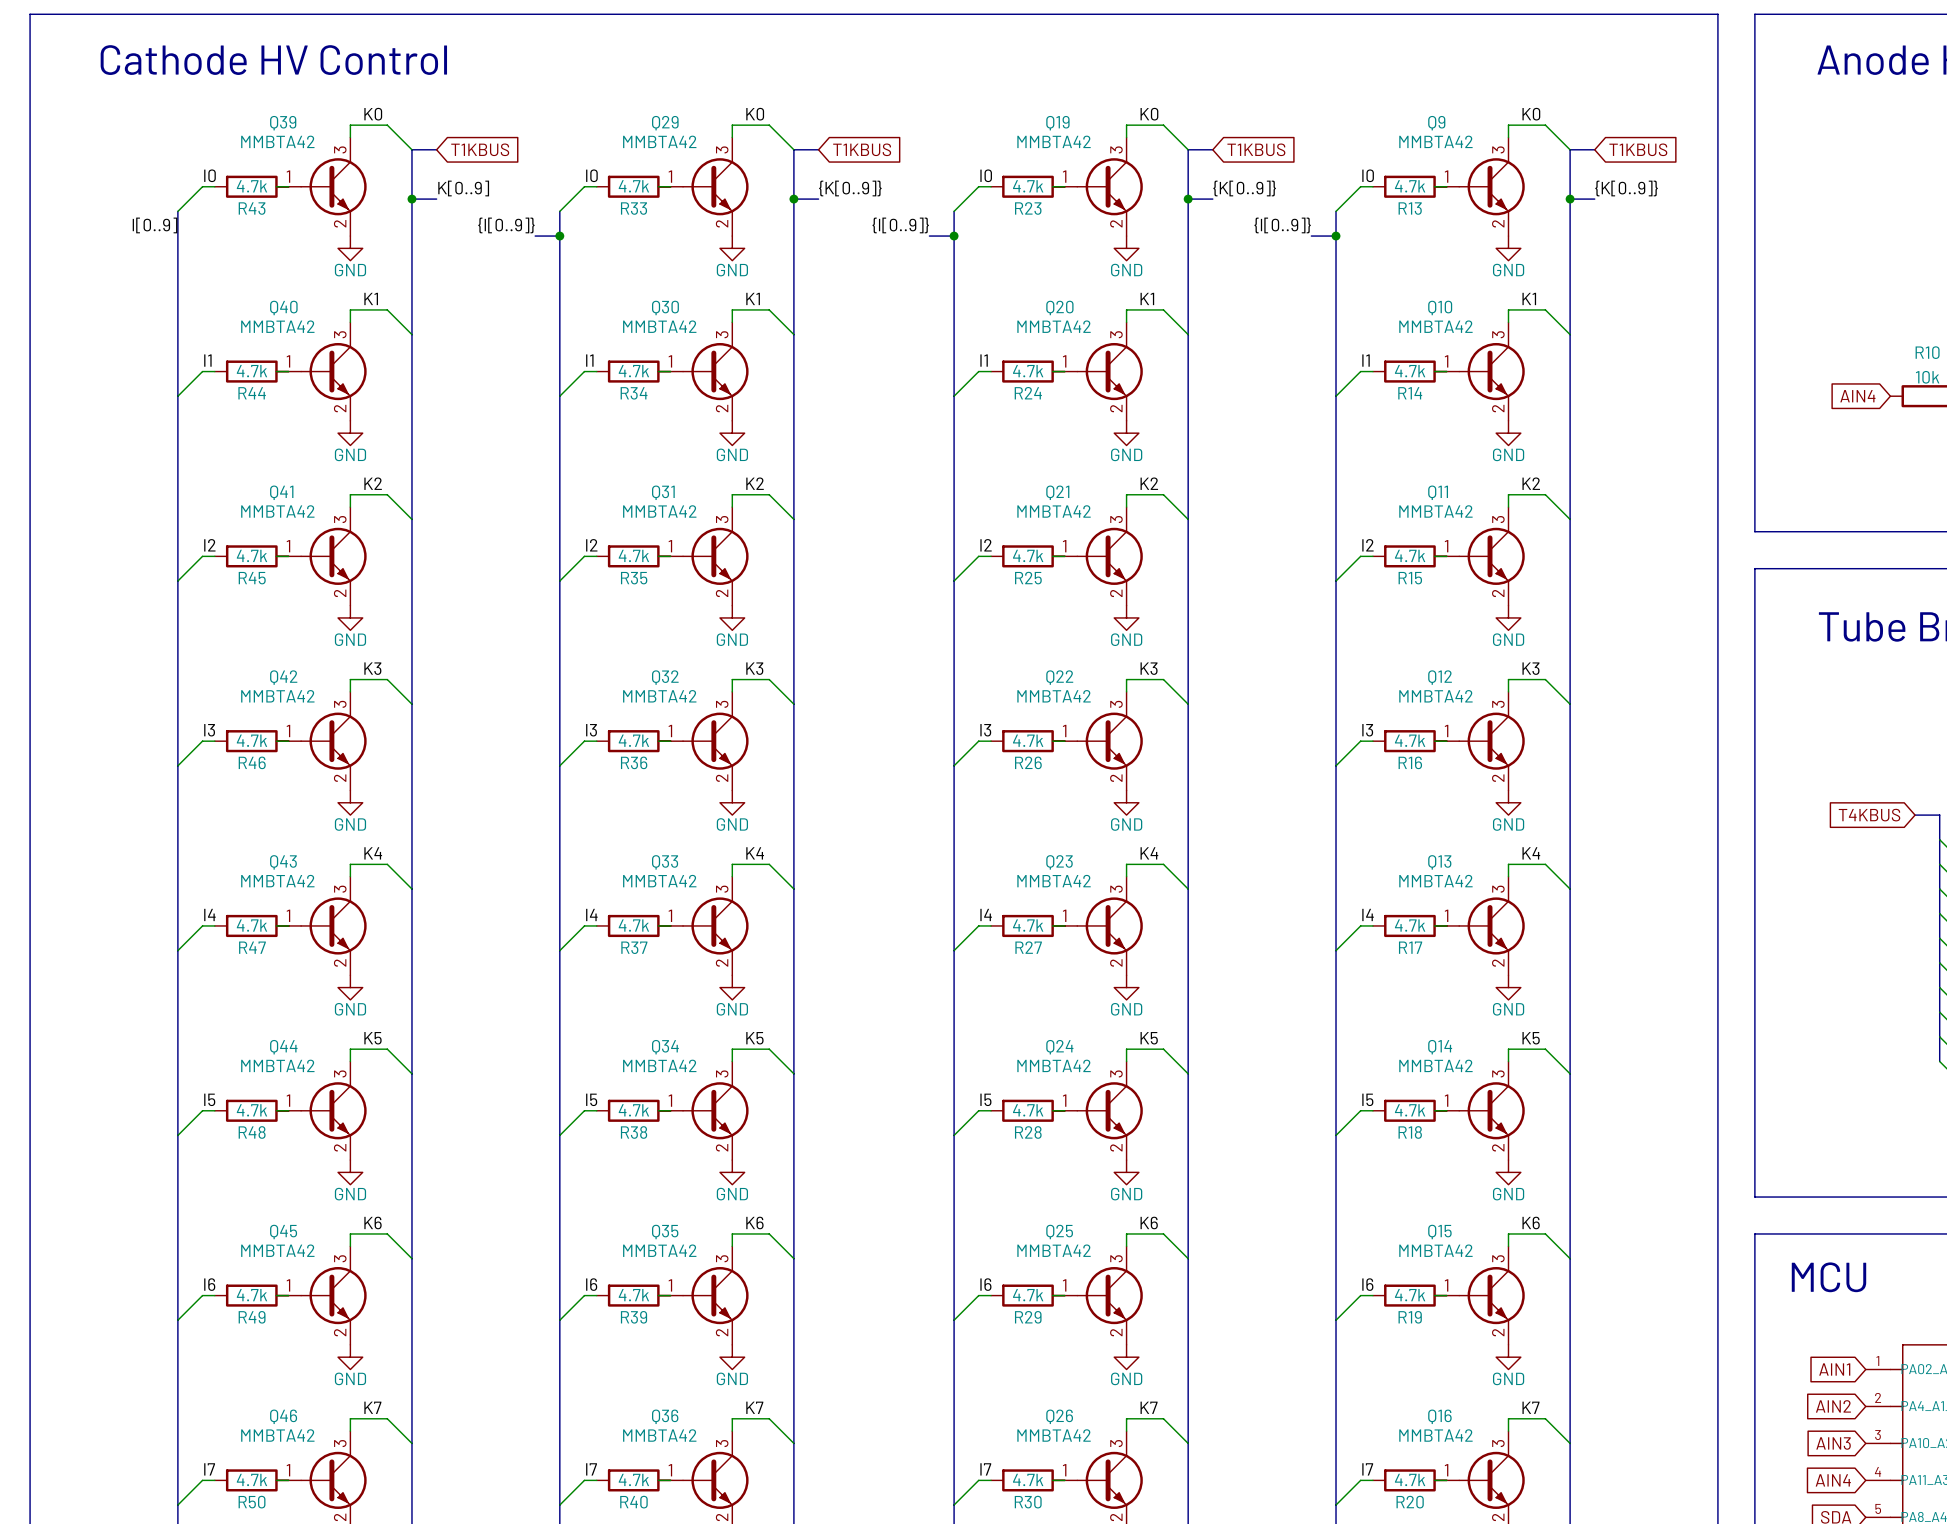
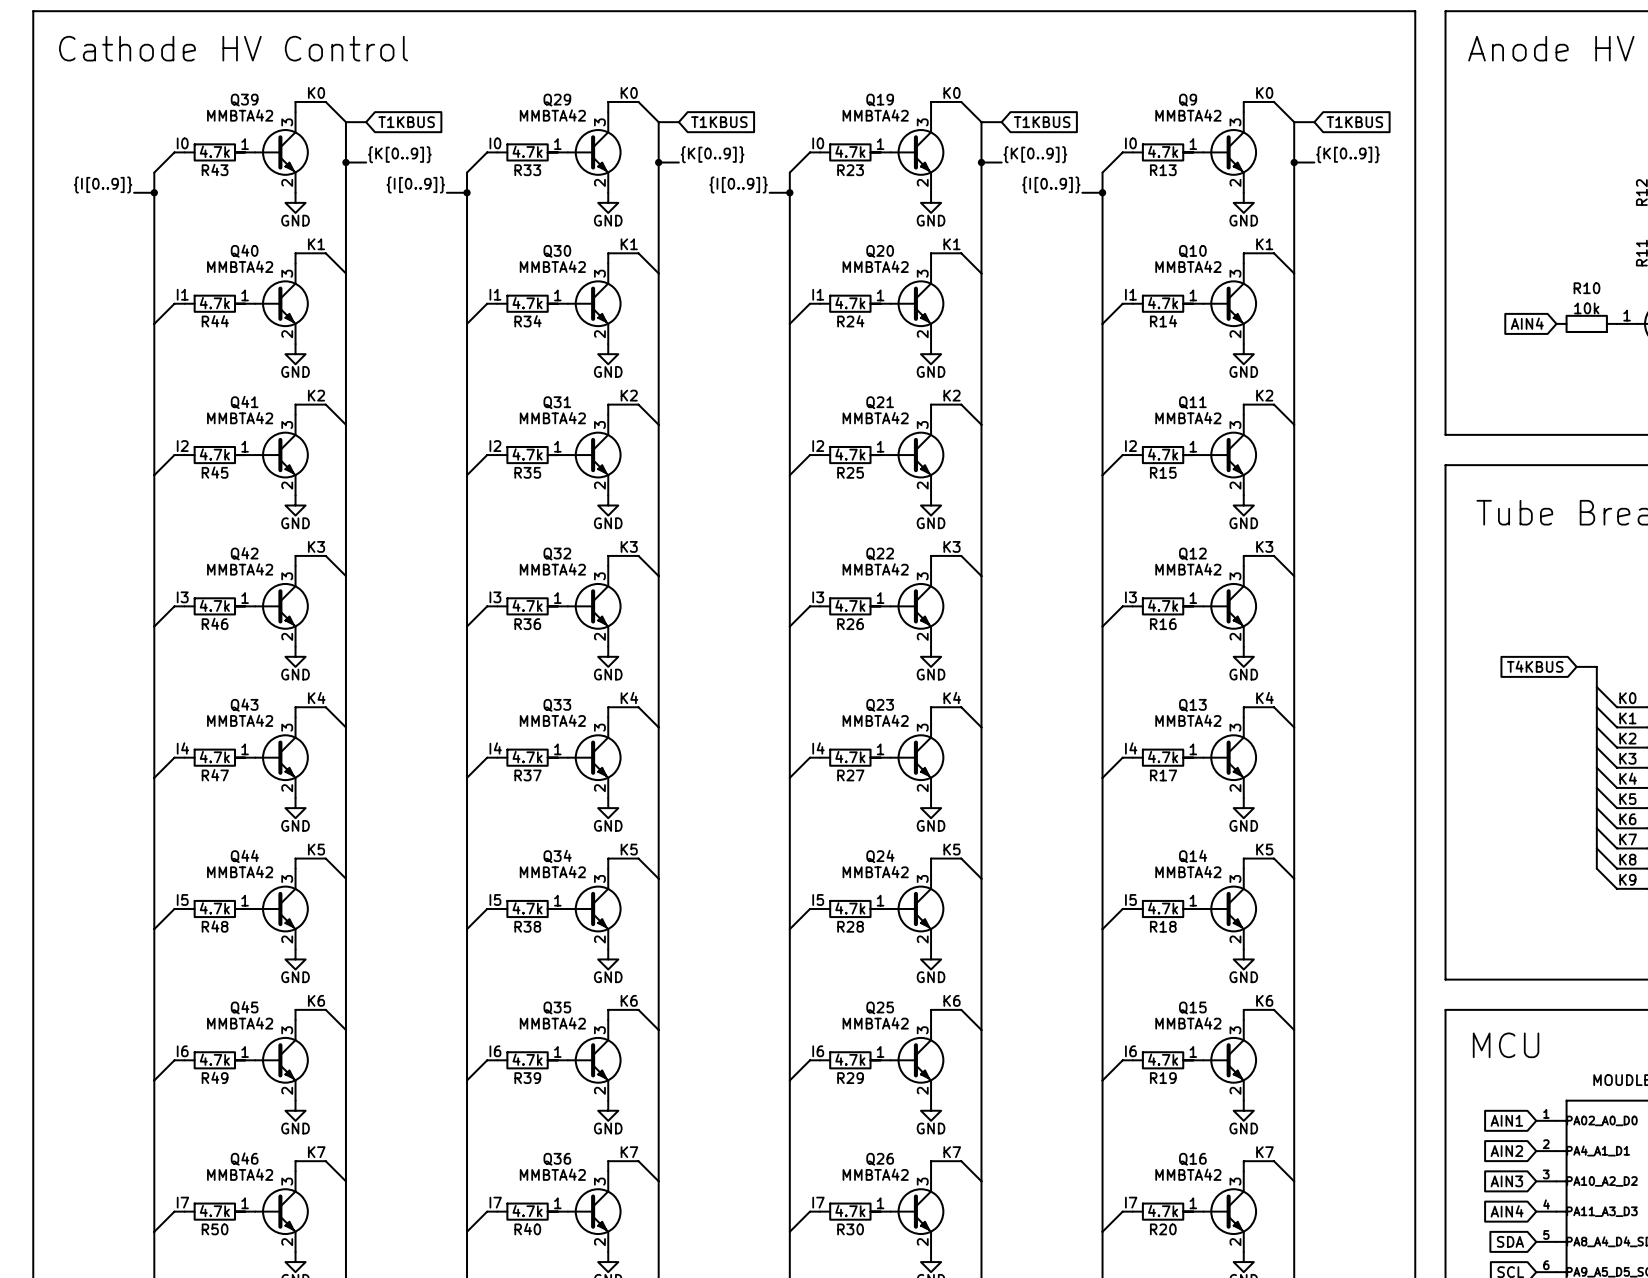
label: K[0..9] (463, 188) -> {K[0..9]} (399, 154)
label: I[0..9] (155, 225) -> {I[0..9]} (103, 184)
bus: none -> (134, 192) (154, 192)
junction: none -> (154, 192)

